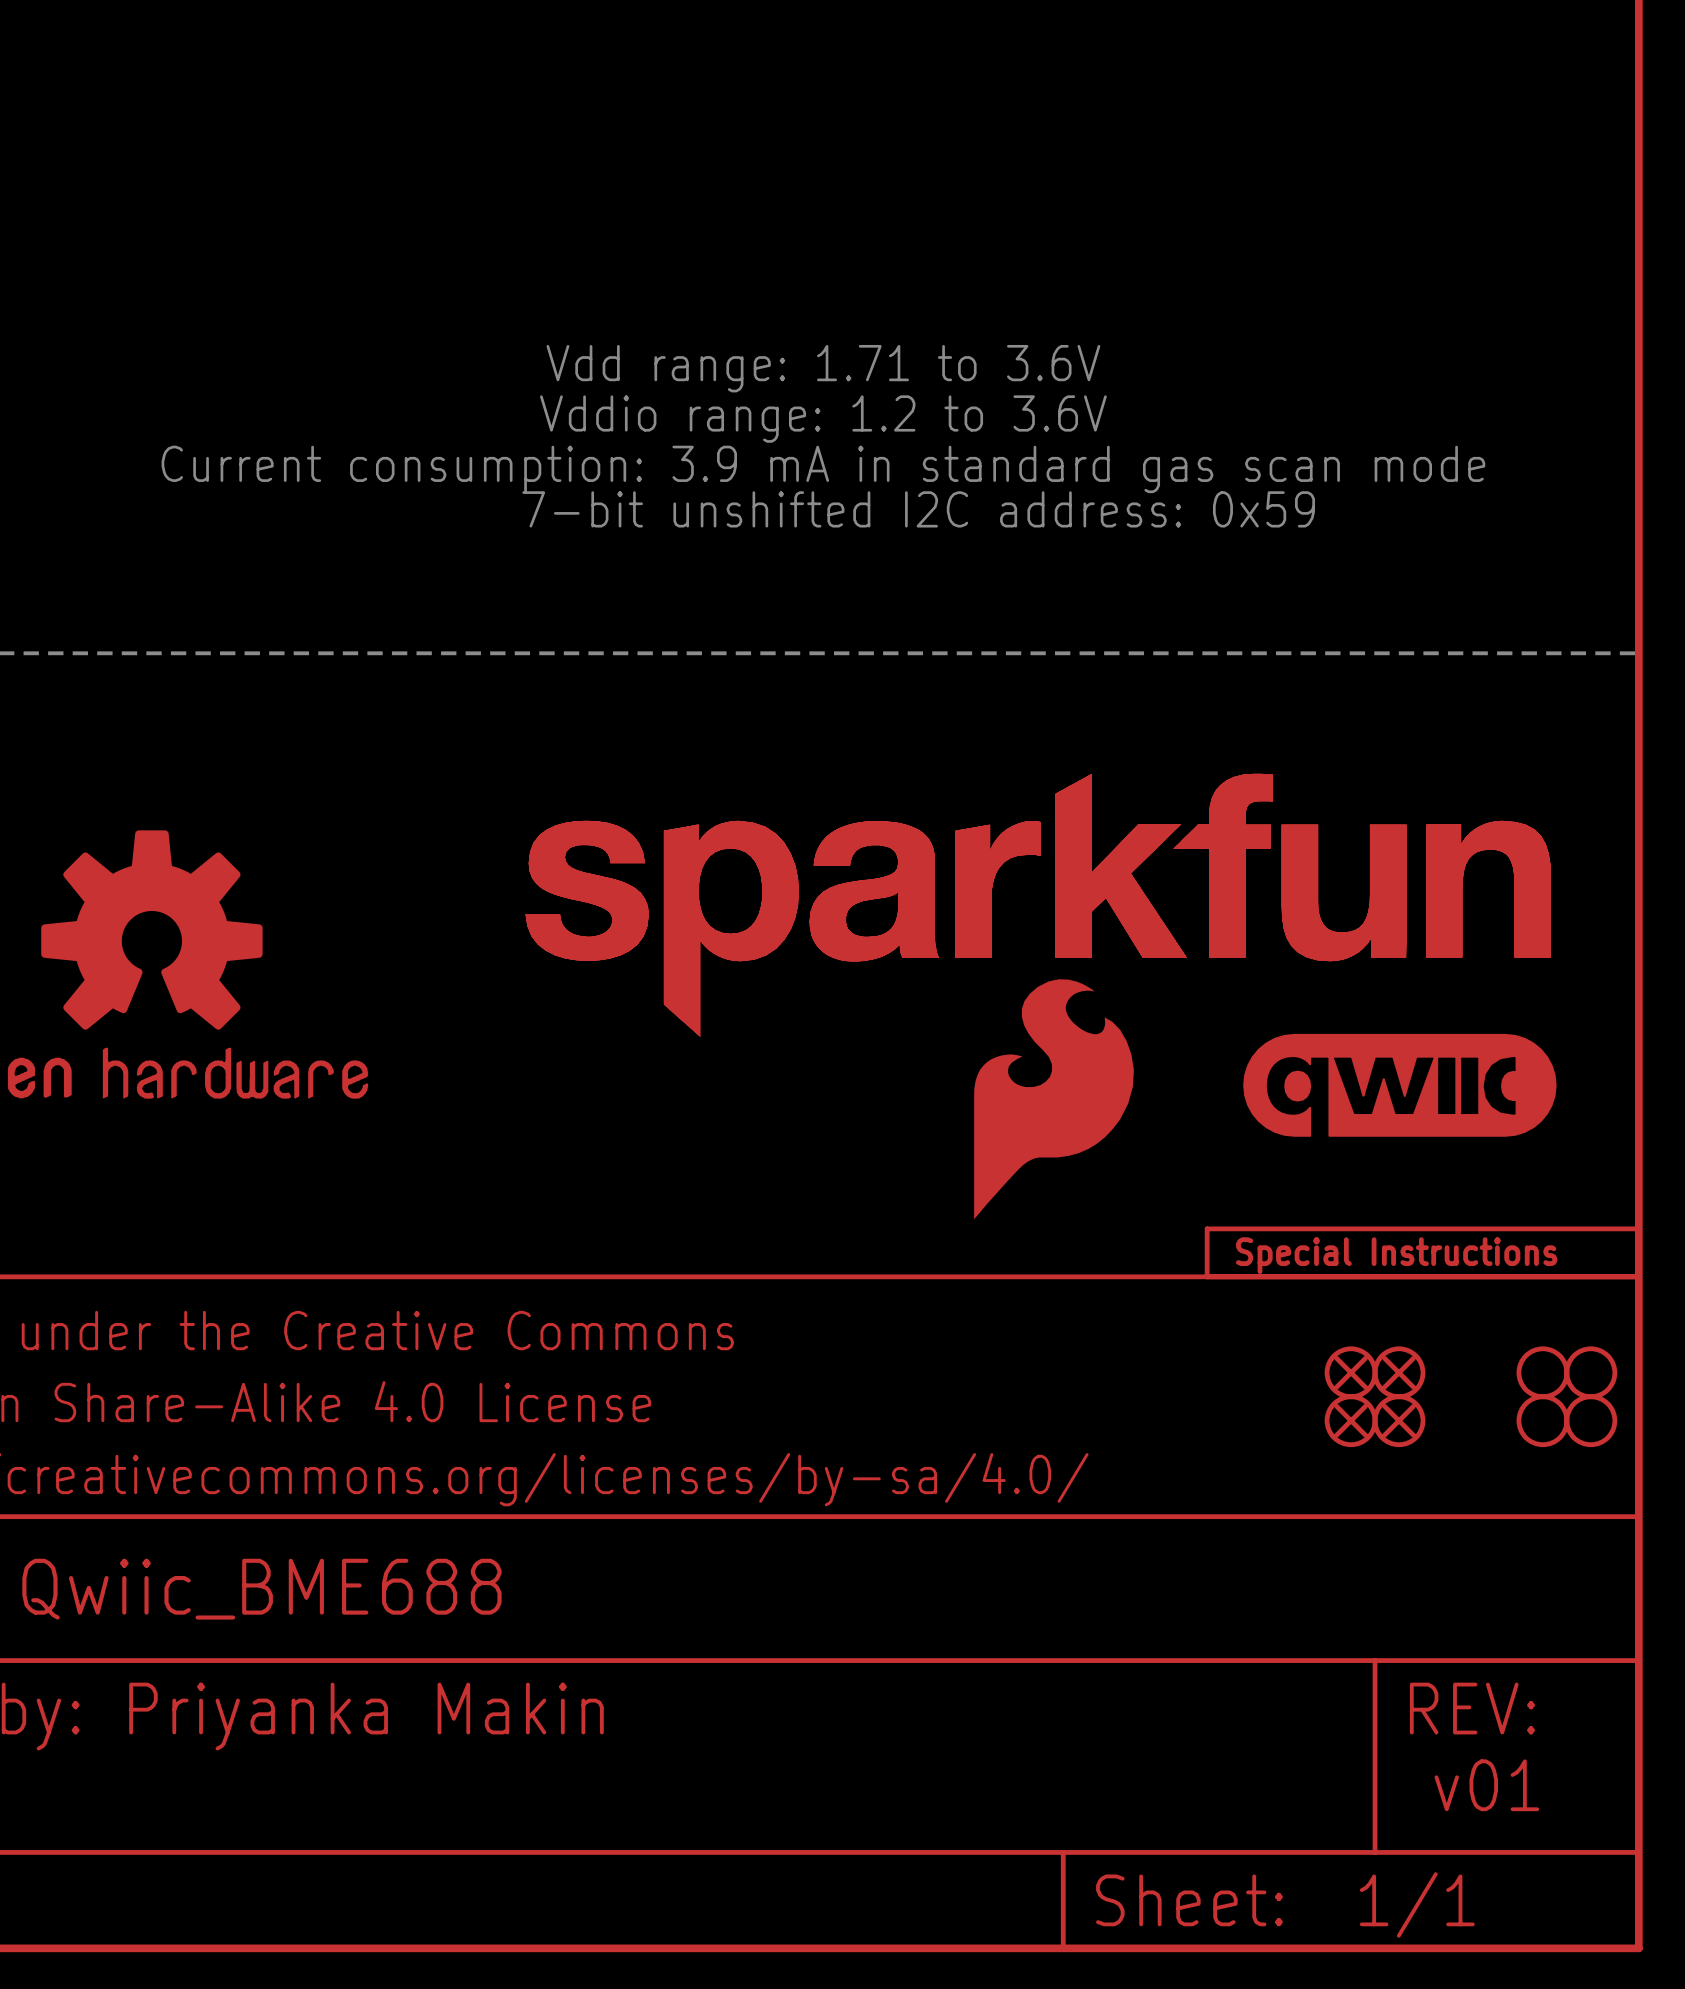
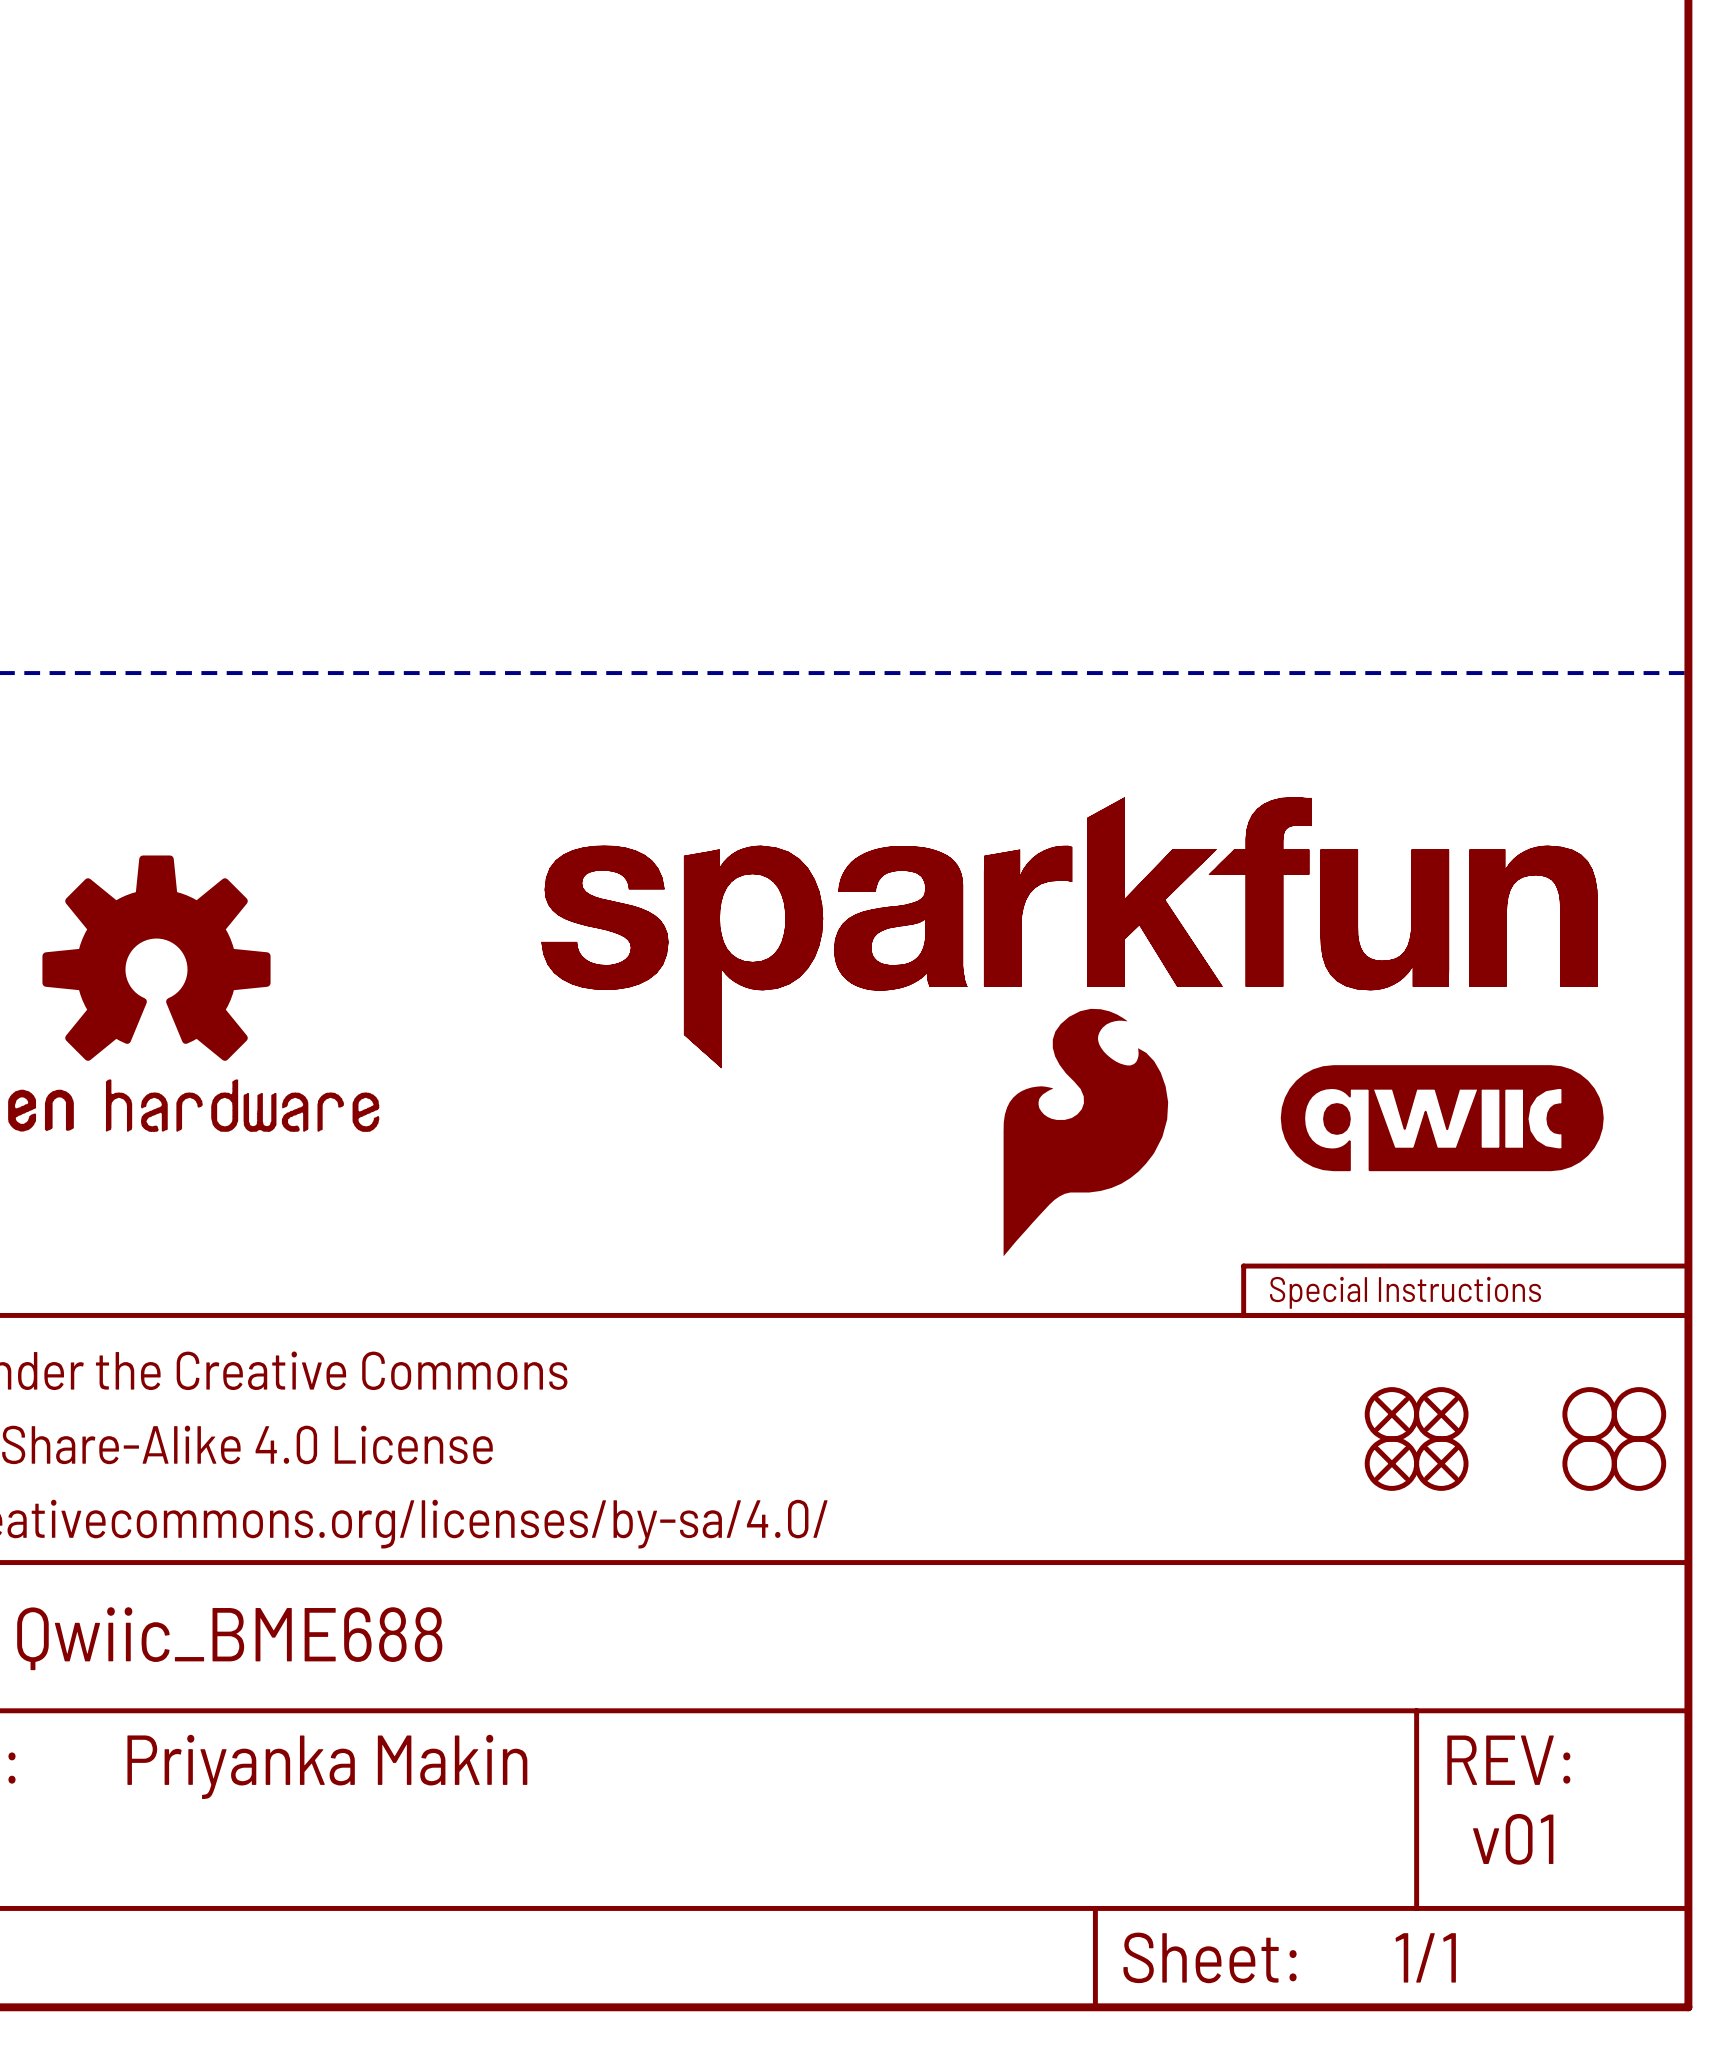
text: Vdd range: 1.71 to 3.6V (823, 368) -> none
text: Vddio range: 1.2 to 3.6V (823, 419) -> none
text: Current consumption: 3.9 mA in standard gas scan mode (823, 469) -> none
text: 7-bit unshifted I2C address: 0x59 (918, 509) -> none

